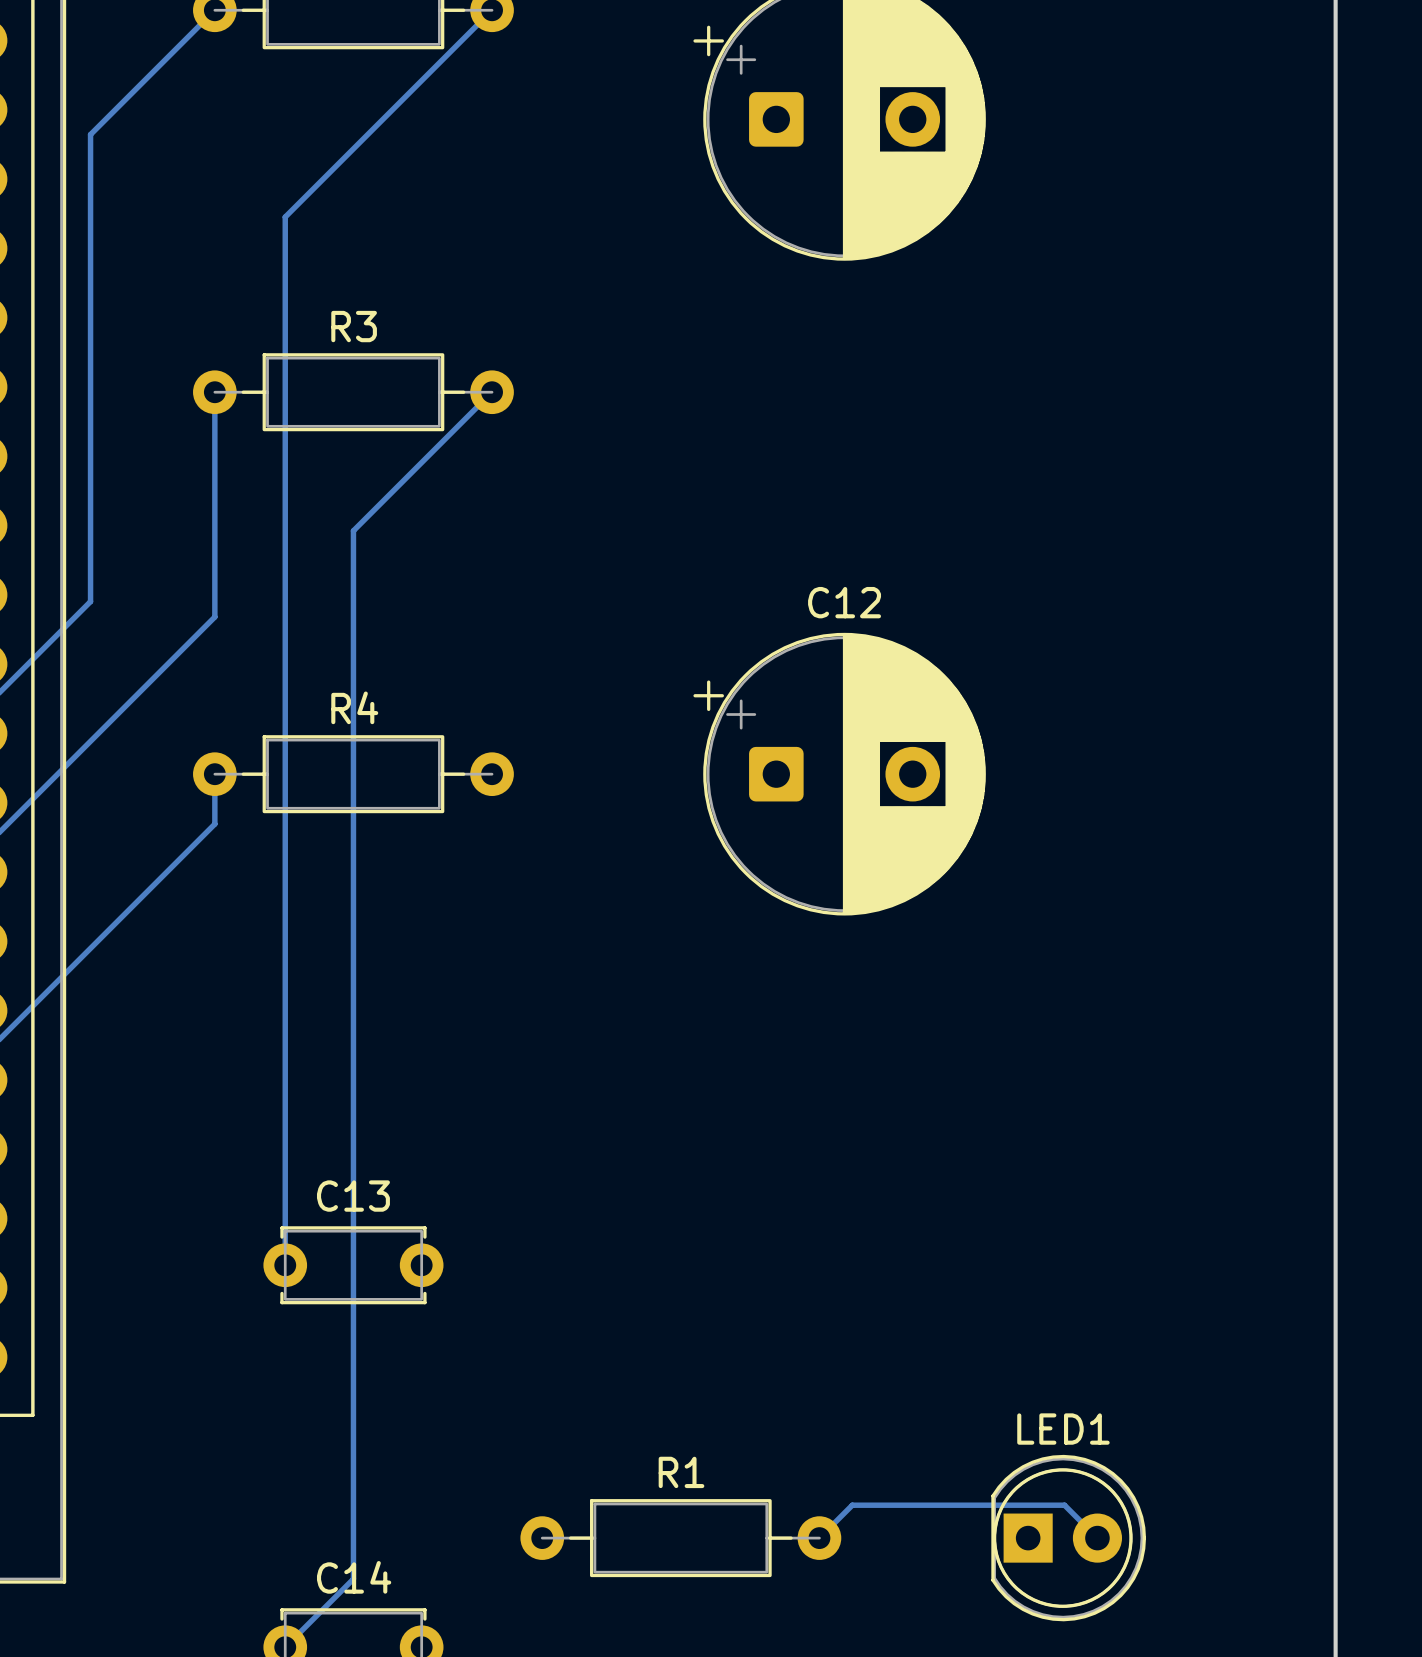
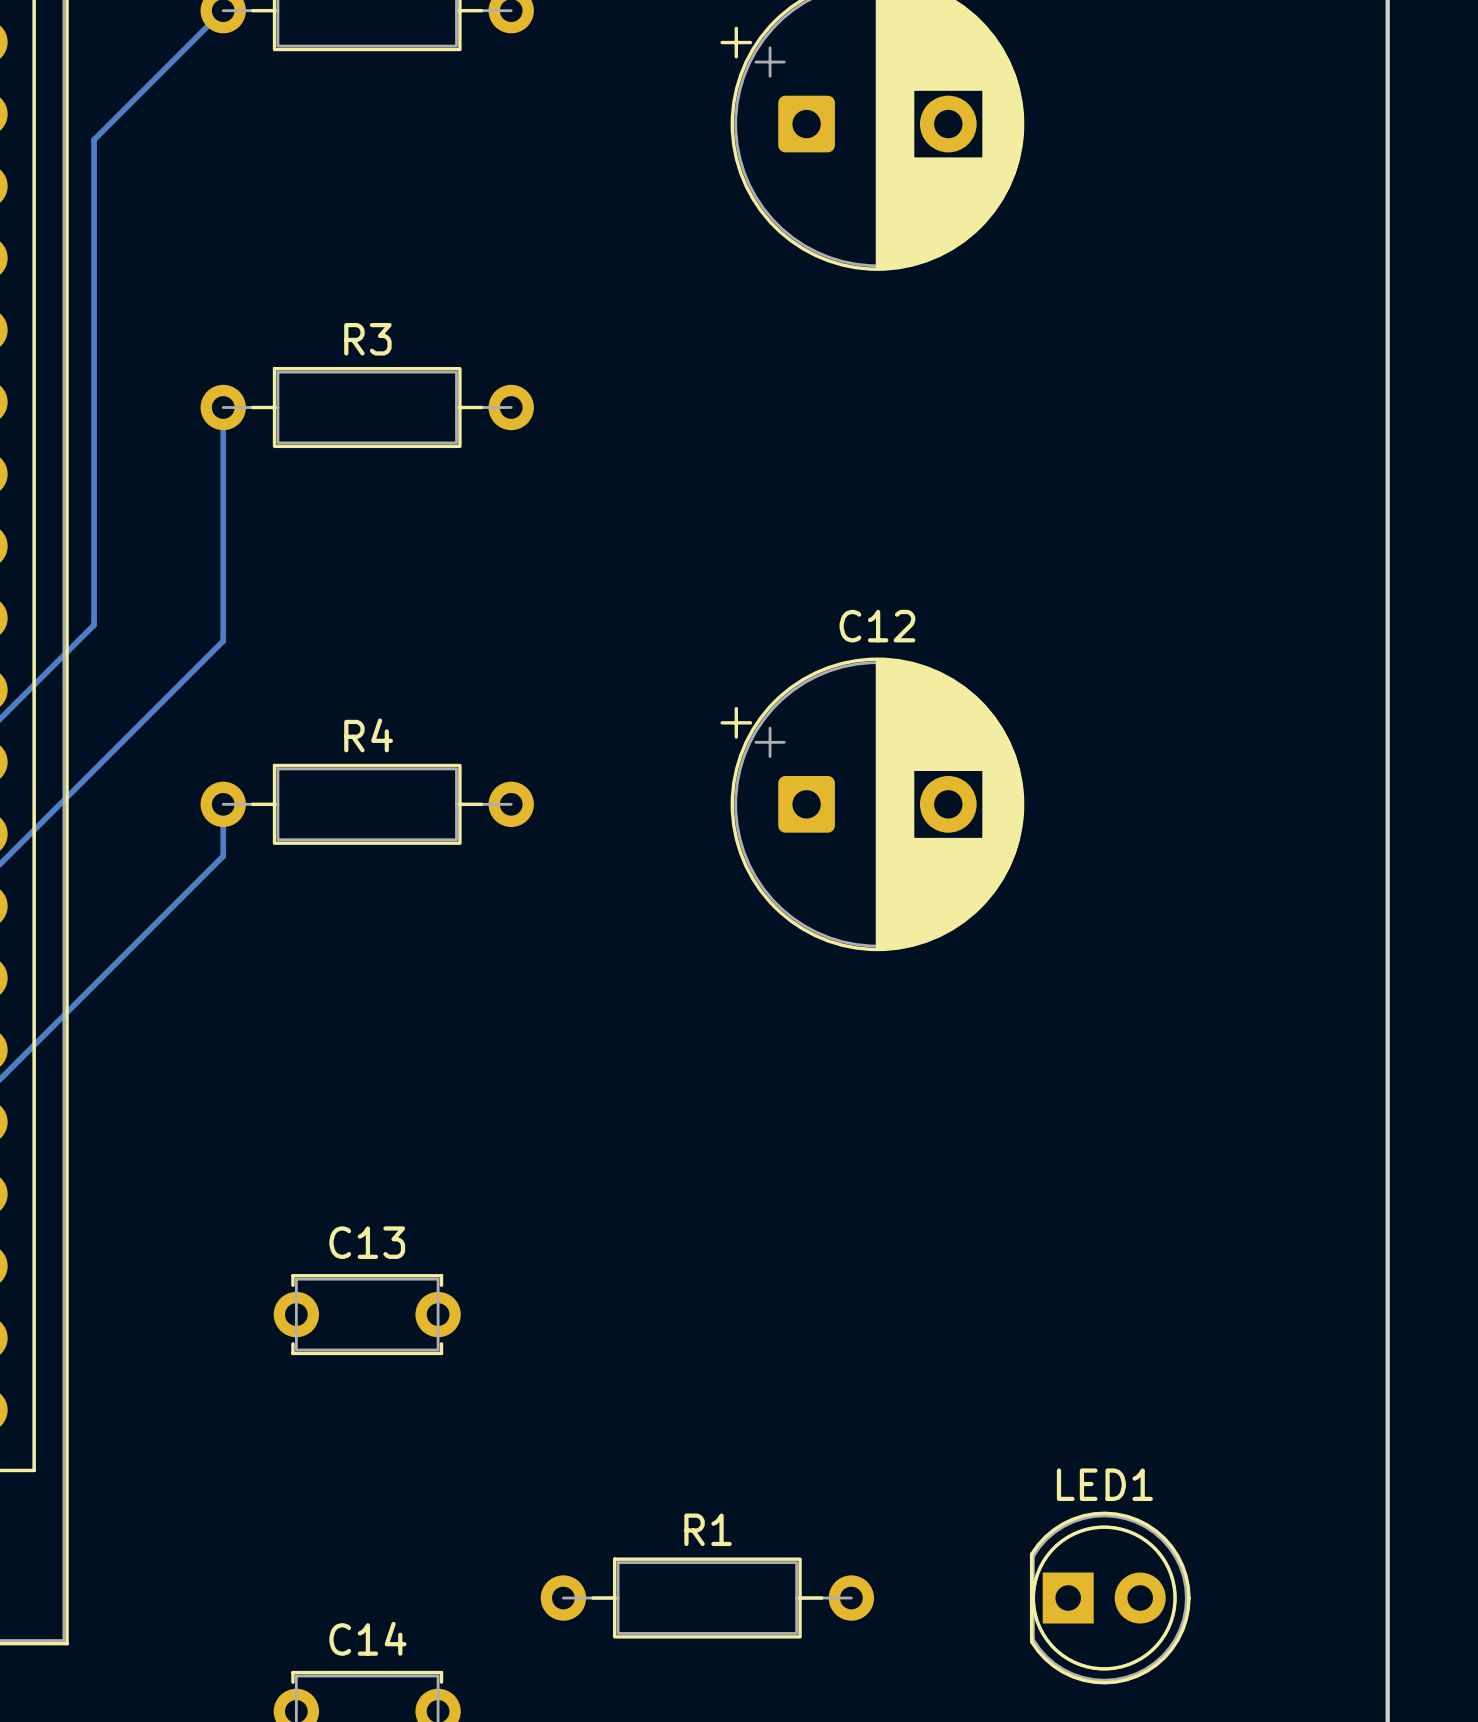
bottom track: (492, 10) (285, 217) (285, 1265) -> none
bottom track: (492, 392) (353, 530) (353, 1579) (285, 1647) -> none
bottom track: (819, 1538) (852, 1505) (1064, 1505) (1097, 1538) -> none

